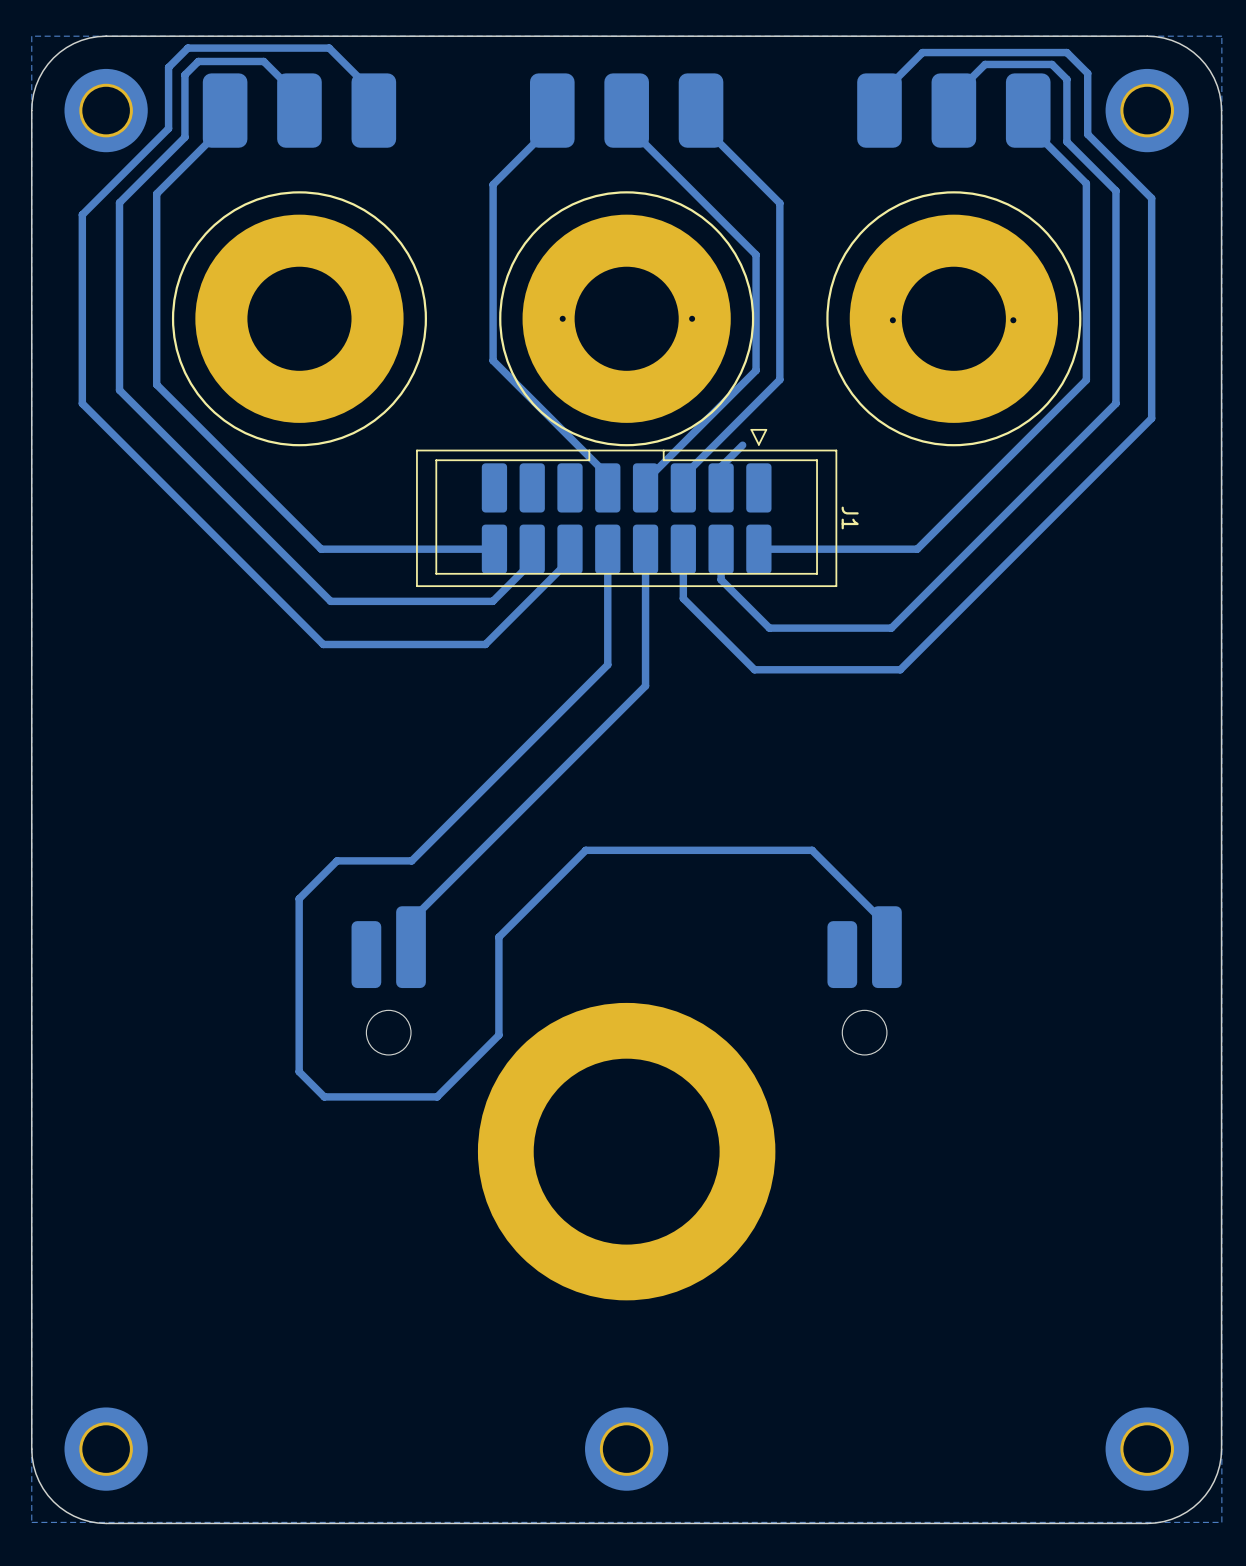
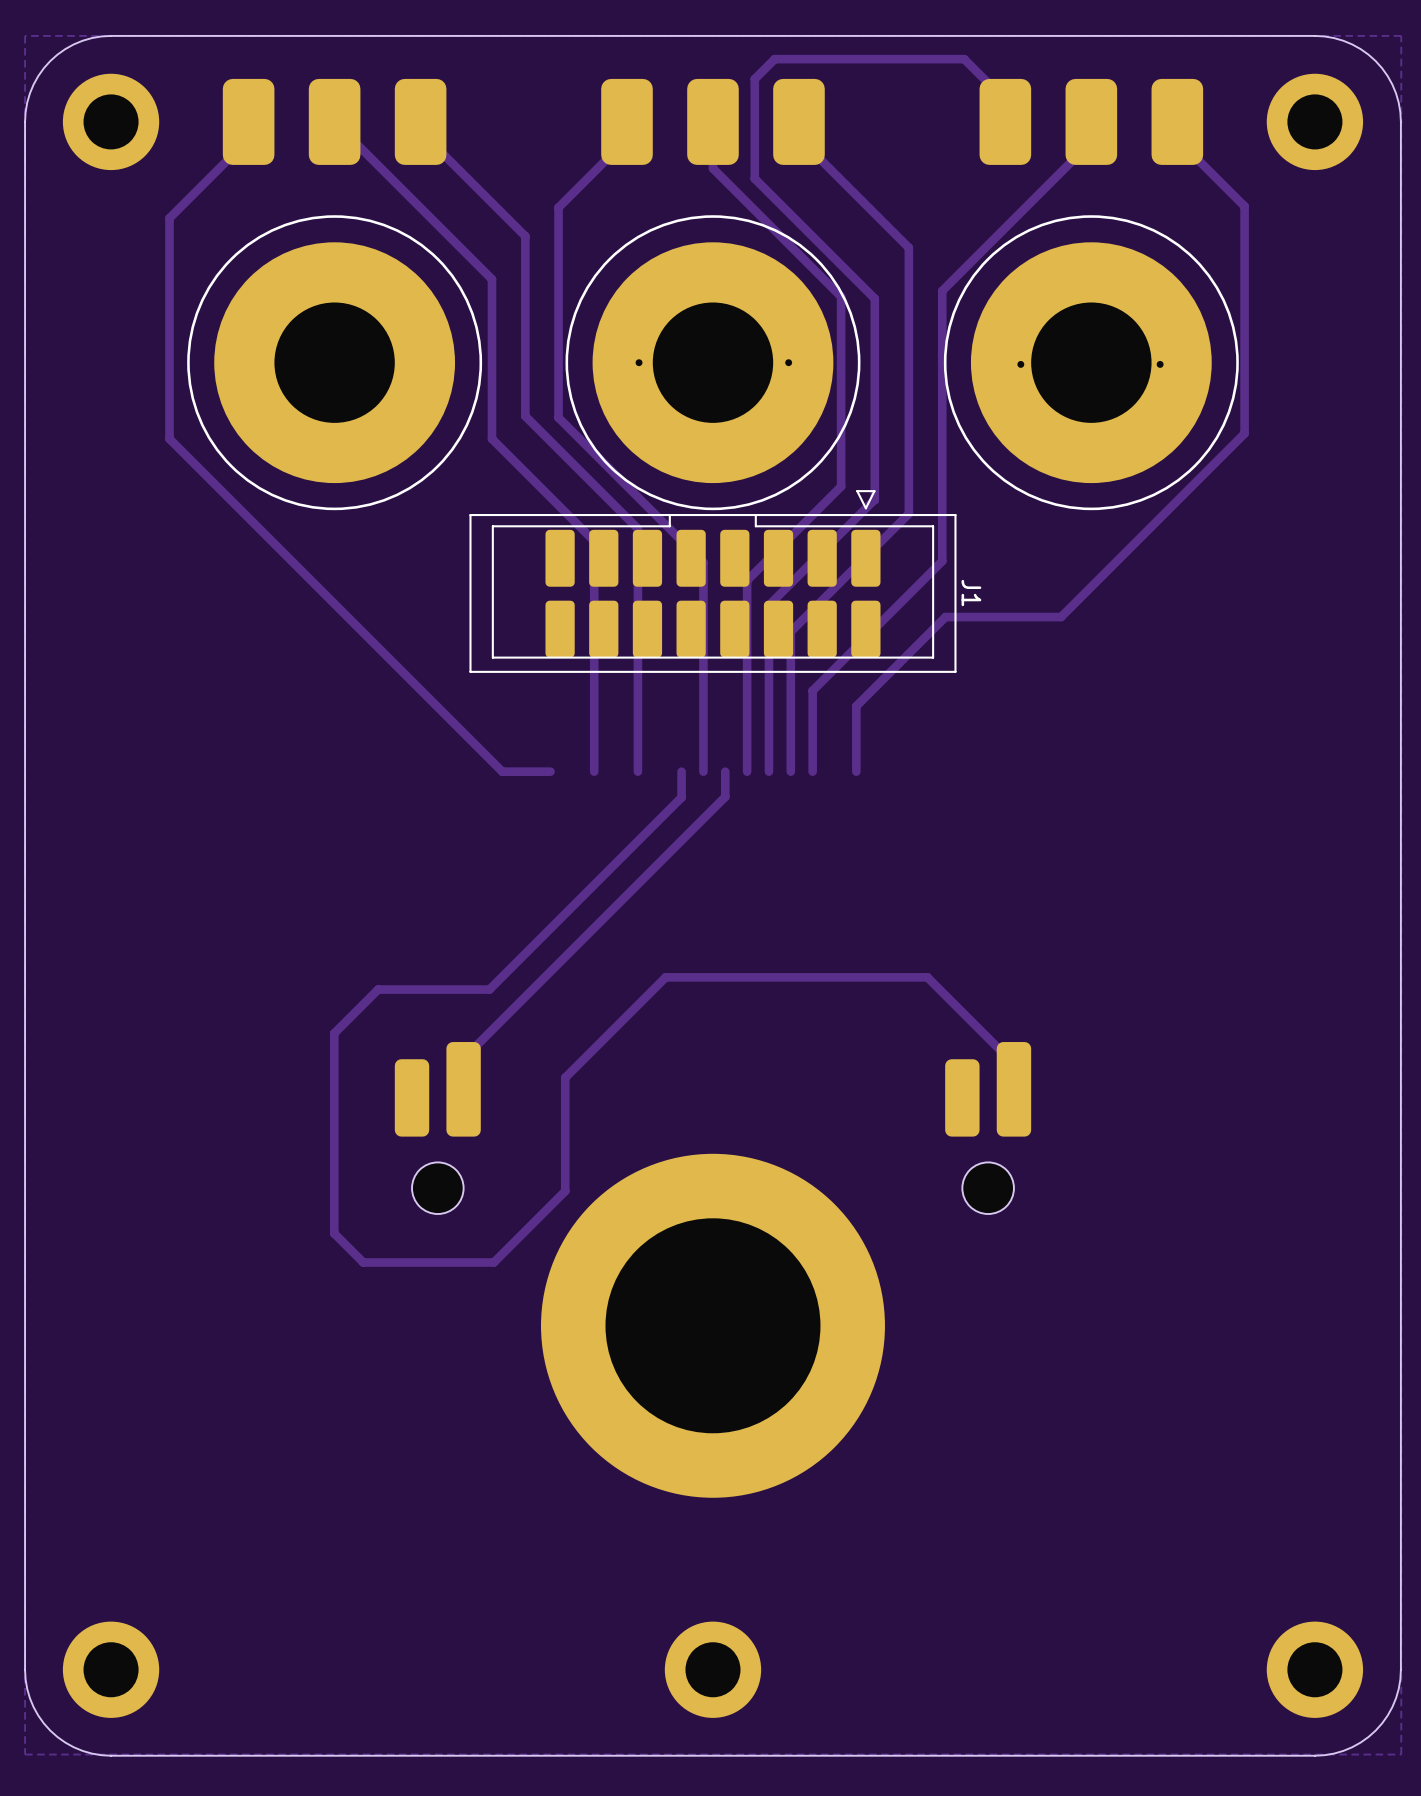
track: (299, 110) (299, 97) (263, 61) (198, 61) (184, 74) (184, 137) (119, 202) (119, 390) (330, 601) (492, 601) (532, 561) (532, 549) -> (334, 121) (491, 279) (491, 438) (594, 541) (594, 771)
track: (373, 110) (373, 92) (329, 48) (187, 48) (168, 67) (168, 128) (82, 214) (82, 403) (323, 644) (485, 644) (570, 559) (570, 549) -> (420, 121) (420, 131) (525, 236) (525, 416) (637, 528) (637, 771)
track: (879, 110) (885, 104) (885, 89) (922, 52) (1066, 52) (1087, 73) (1087, 134) (1151, 198) (1151, 418) (900, 669) (754, 669) (683, 598) (683, 549) -> (1005, 121) (1005, 100) (964, 59) (774, 59) (754, 79) (754, 178) (874, 298) (874, 500) (768, 605) (768, 771)
track: (953, 110) (953, 95) (985, 64) (1052, 64) (1066, 79) (1066, 141) (1115, 190) (1115, 403) (891, 628) (769, 628) (721, 579) (721, 549) -> (1091, 121) (1084, 128) (1084, 157) (1075, 157) (942, 290) (942, 561) (812, 690) (812, 771)
track: (626, 125) (756, 254) (756, 370) (645, 481) (645, 487) -> (712, 139) (712, 168) (841, 296) (841, 486) (747, 580) (747, 771)
track: (779, 203) (779, 379) (683, 476) (683, 487) -> (890, 229) (908, 247) (908, 513) (790, 631) (790, 771)
track: (493, 360) (607, 475) (607, 487) -> (558, 411) (558, 417) (703, 562) (703, 771)
track: (742, 445) (721, 466) (721, 487) -> none
track: (927, 538) (917, 549) (758, 549) -> (1061, 617) (945, 617) (856, 706) (856, 771)
track: (494, 549) (321, 549) -> (550, 771) (502, 771) (359, 629)
track: (607, 549) (607, 664) (411, 860) -> (681, 771) (681, 797) (489, 989) (464, 989)
track: (645, 549) (645, 685) (637, 694) -> (725, 771) (725, 796)

